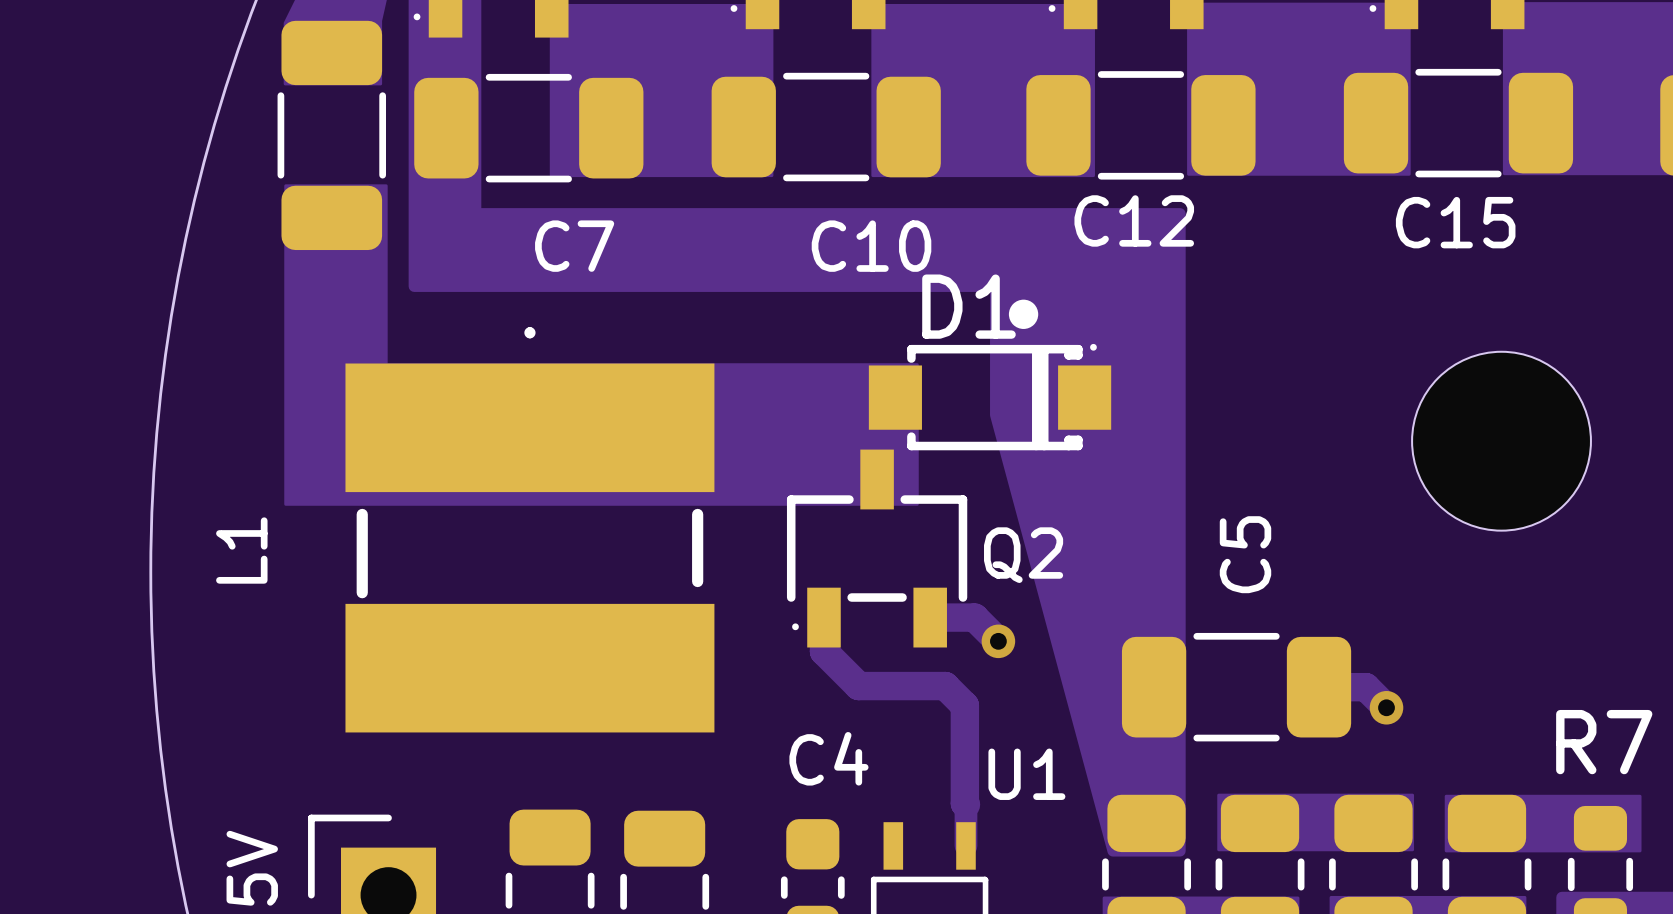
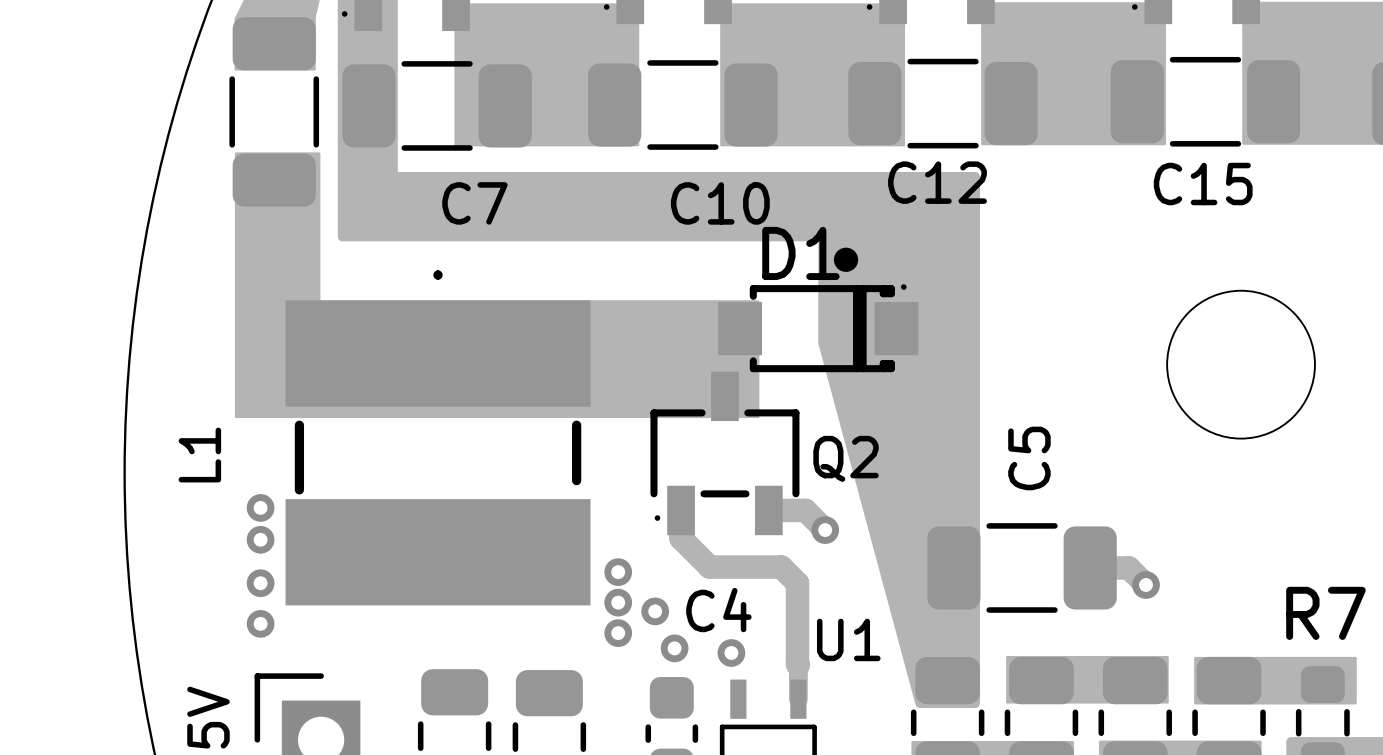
via: none -> (260, 507)
via: none -> (260, 539)
via: none -> (618, 572)
via: none -> (260, 583)
via: none -> (618, 602)
via: none -> (655, 611)
via: none -> (260, 623)
C4 name position: C4 (828, 758) -> C4 (718, 610)
via: none -> (618, 633)
via: none -> (674, 648)
via: none -> (731, 652)

